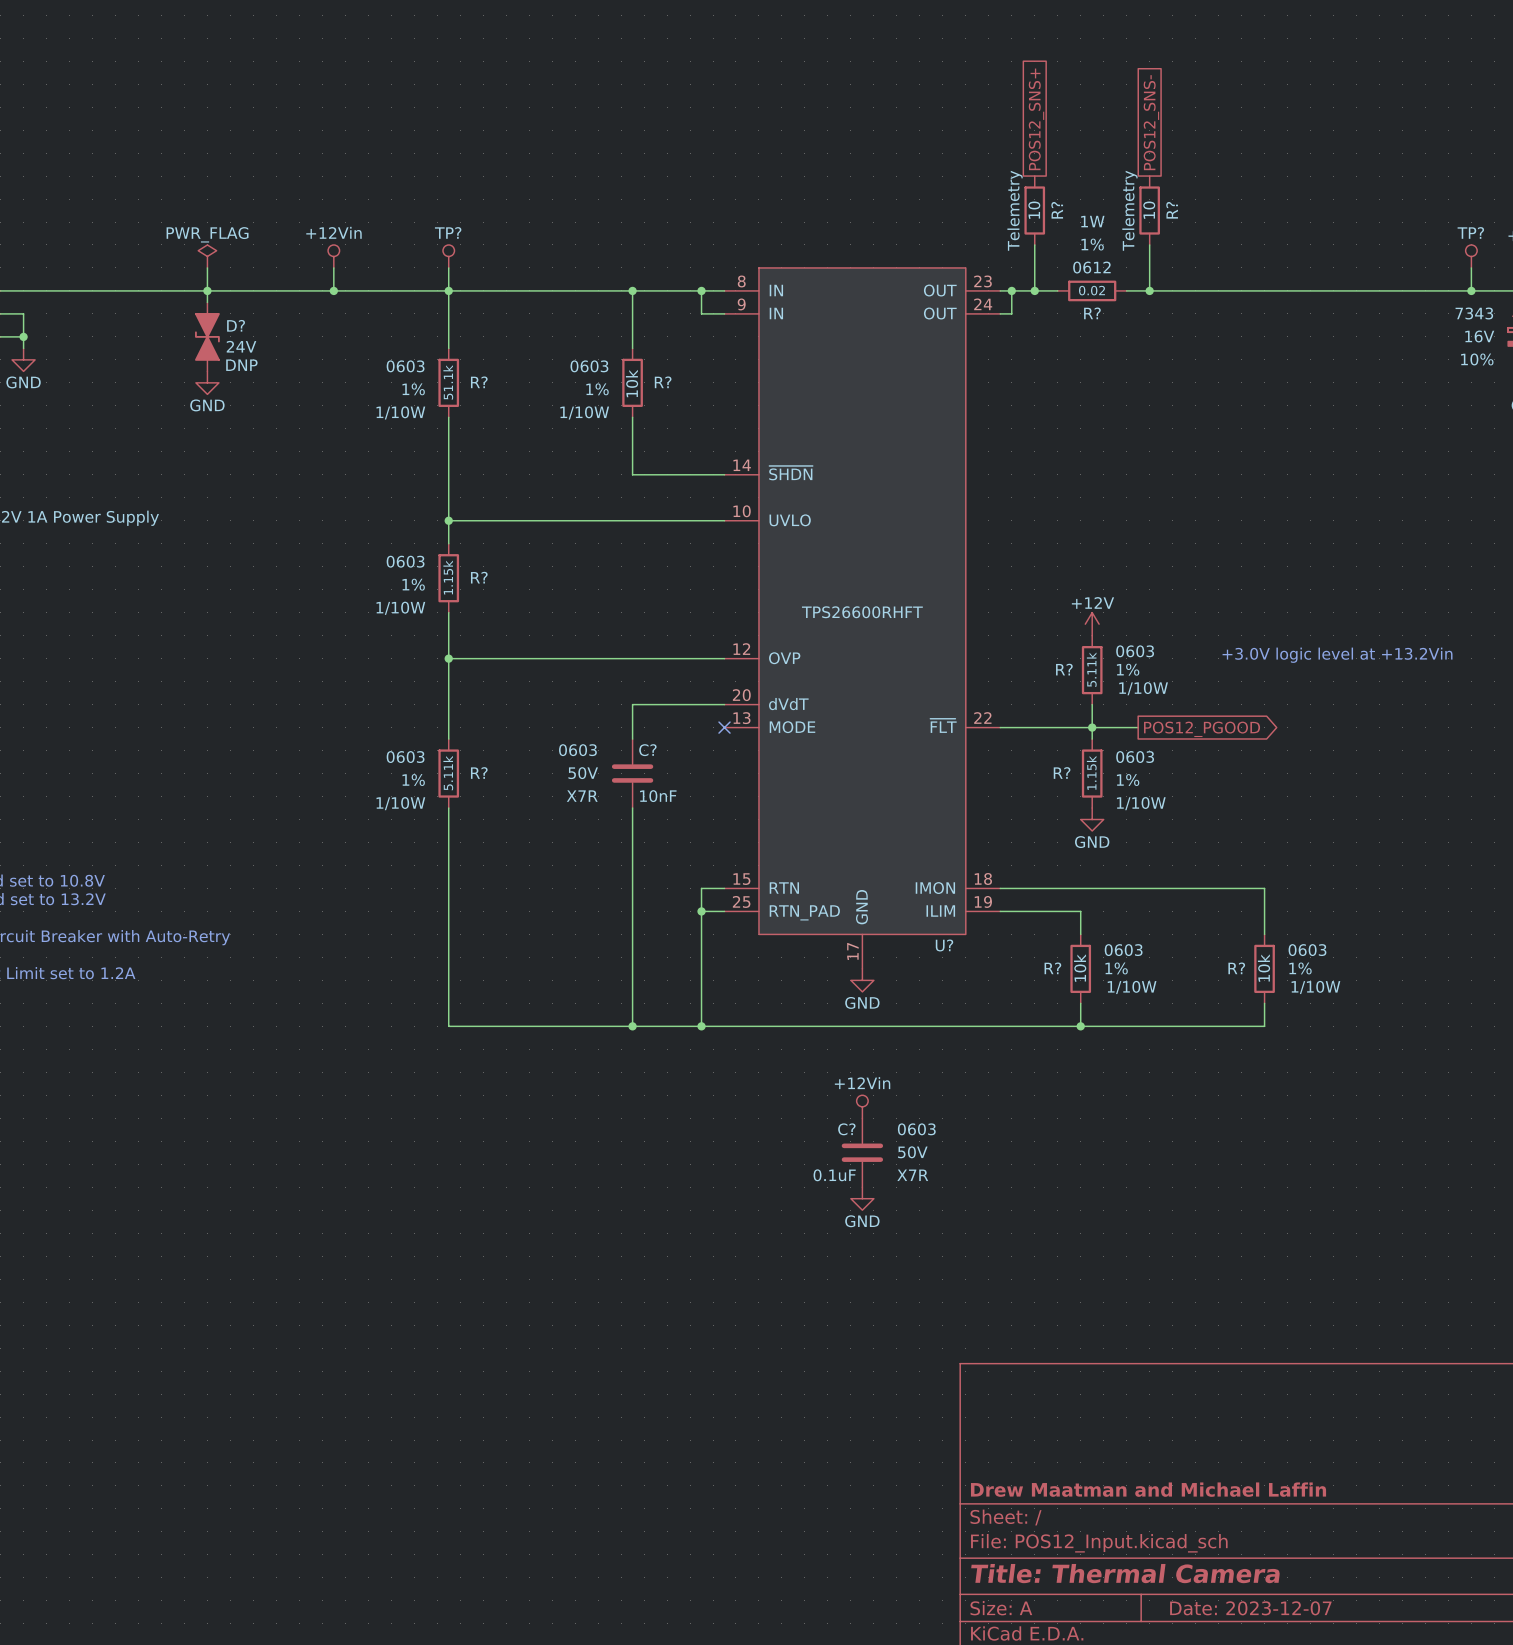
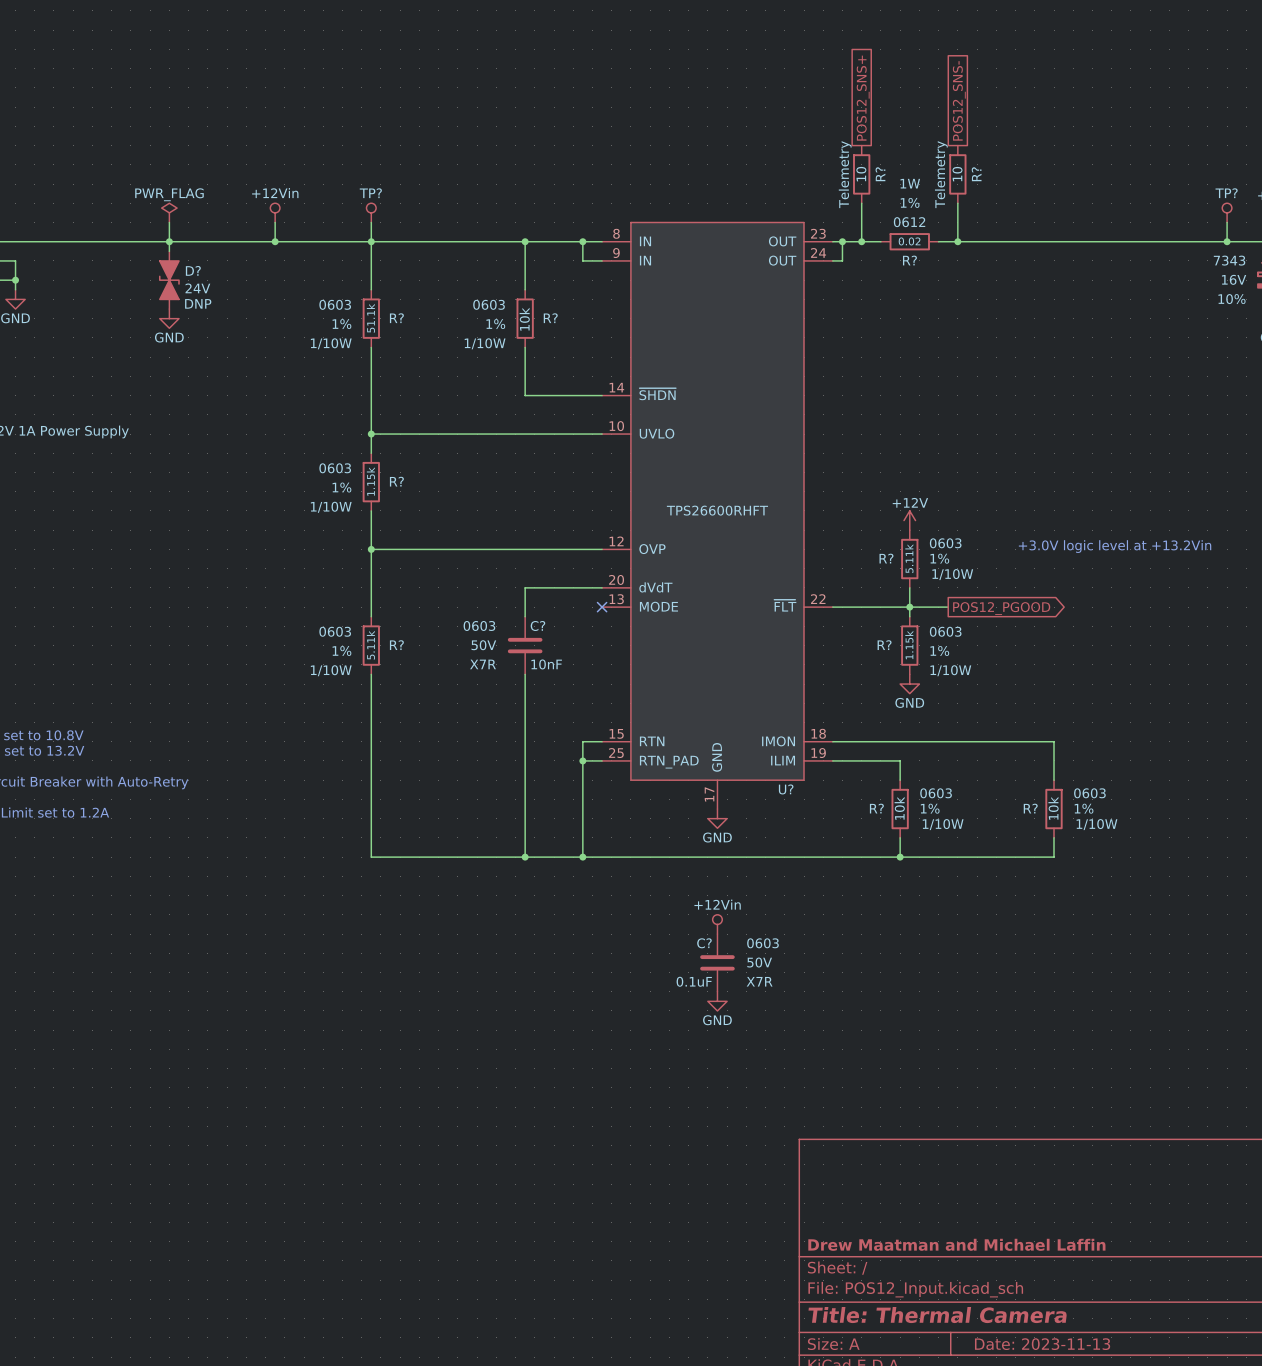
title block: Date: 2023-12-07 (1250, 1608) -> Date: 2023-11-13 (1042, 1344)

